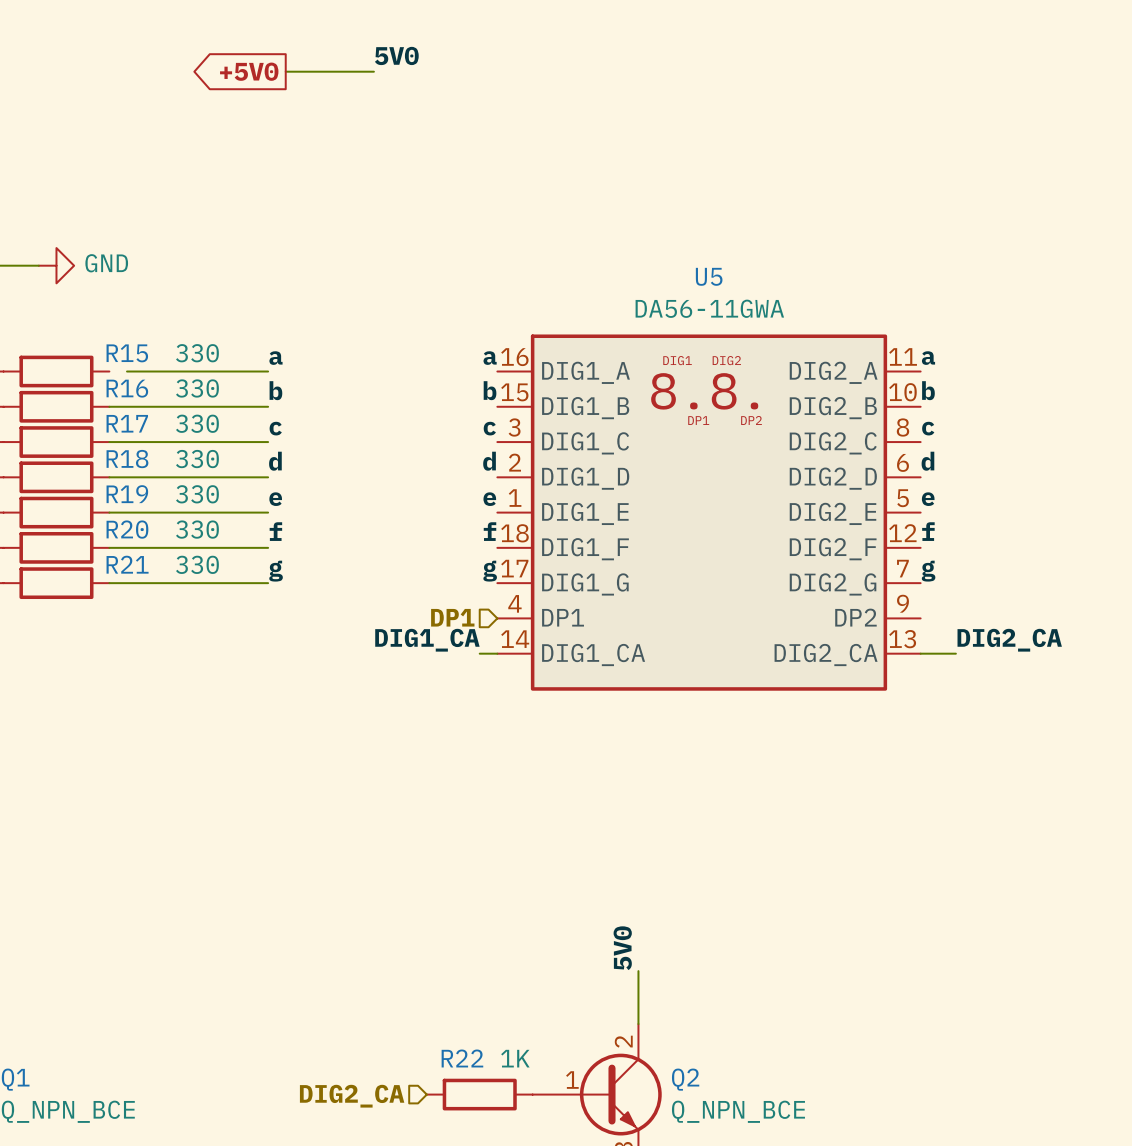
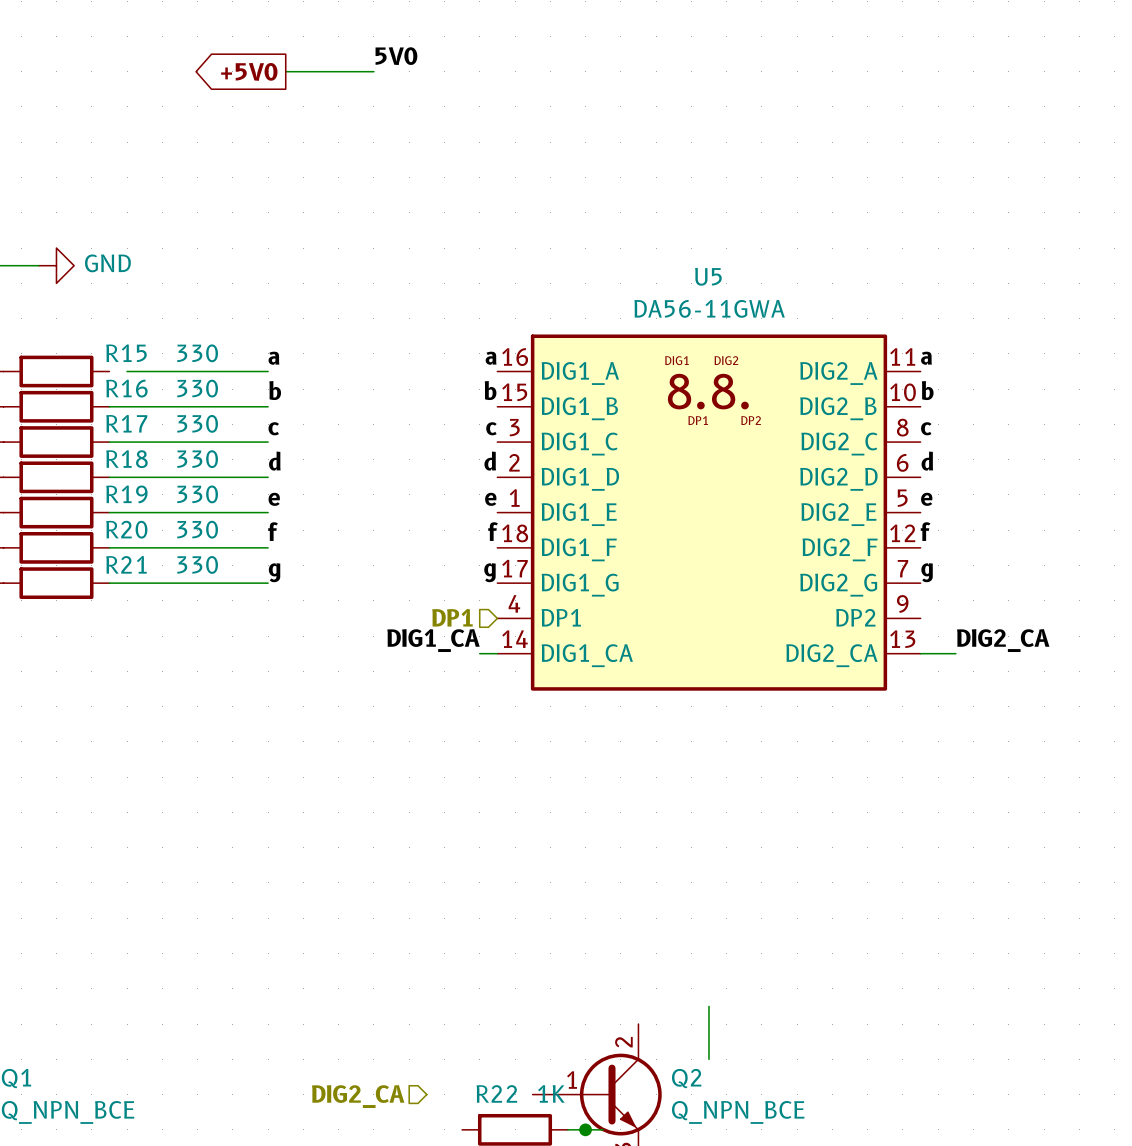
label: 5V0 (622, 948) -> none
wire: (638, 971) (638, 1024) -> (708, 1006) (708, 1059)
R22 position: (479, 1094) -> (515, 1129)
wire: none -> (567, 1129) (603, 1129)
junction: none -> (585, 1129)

